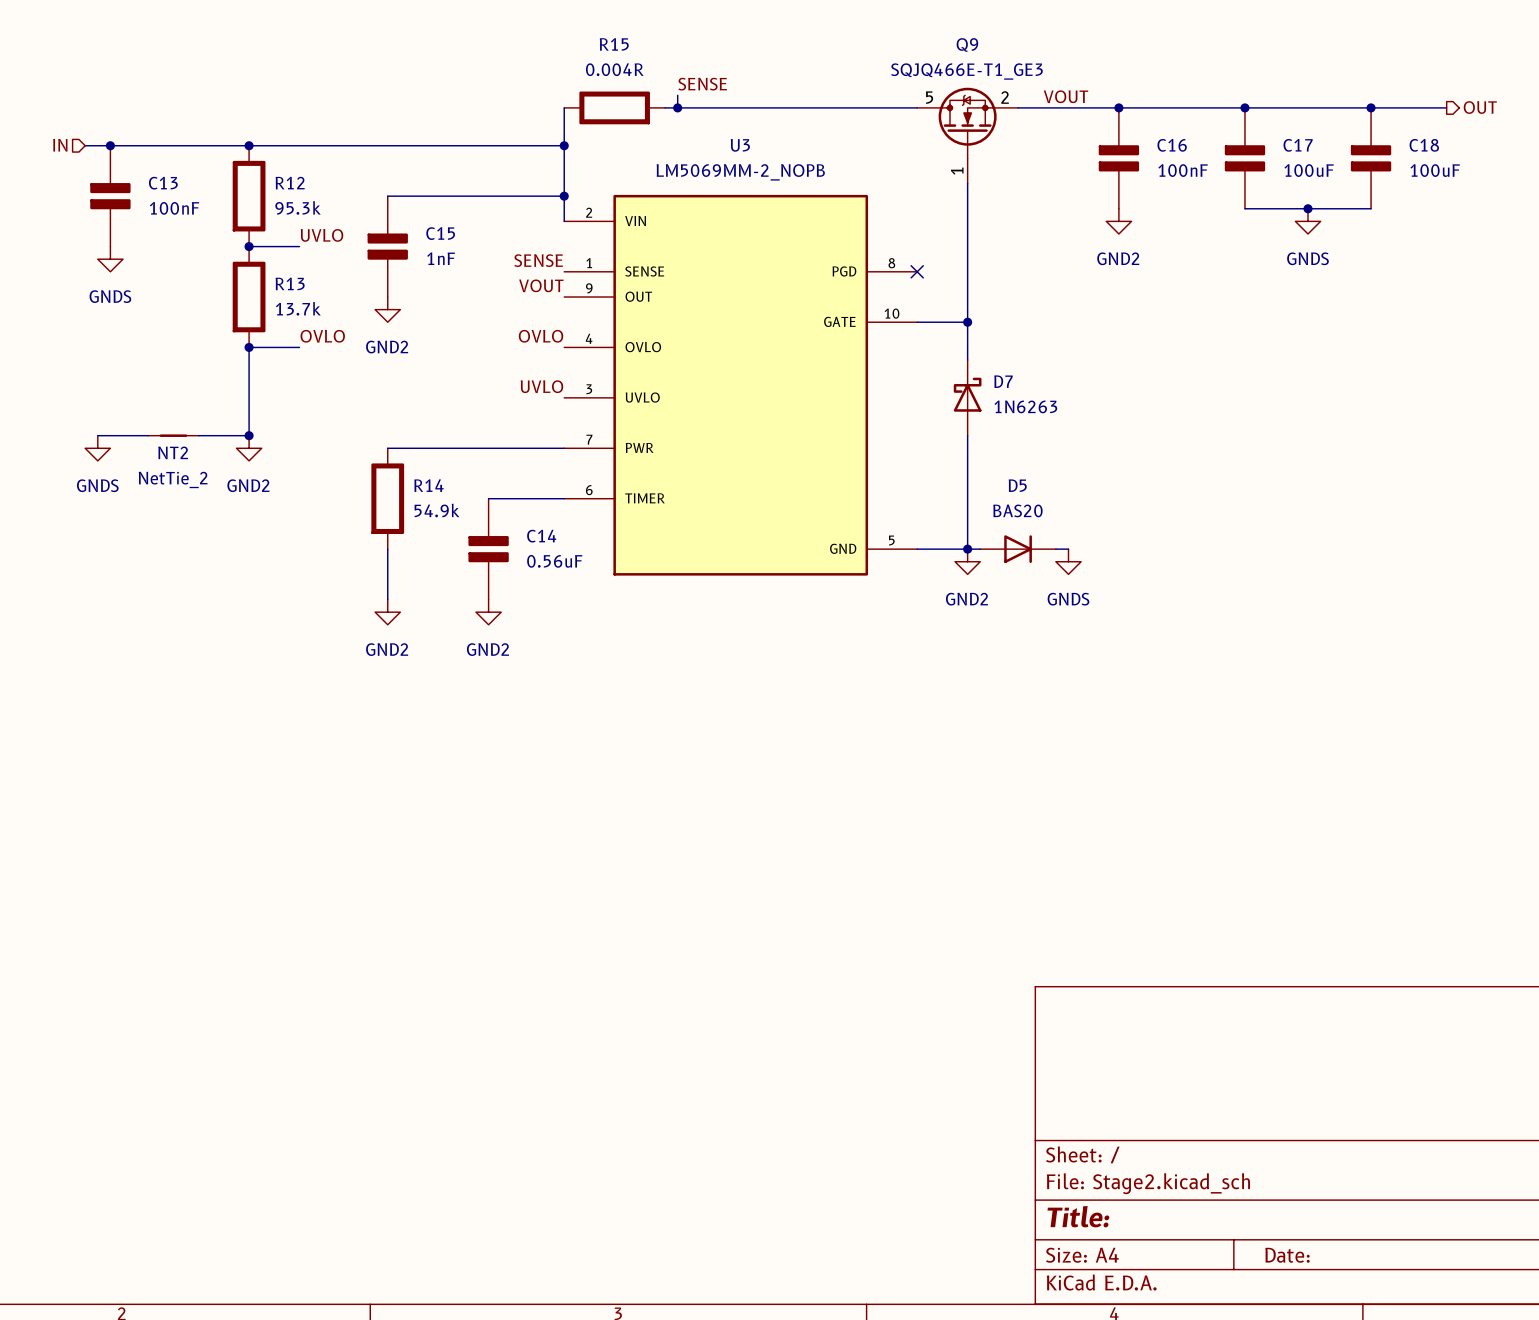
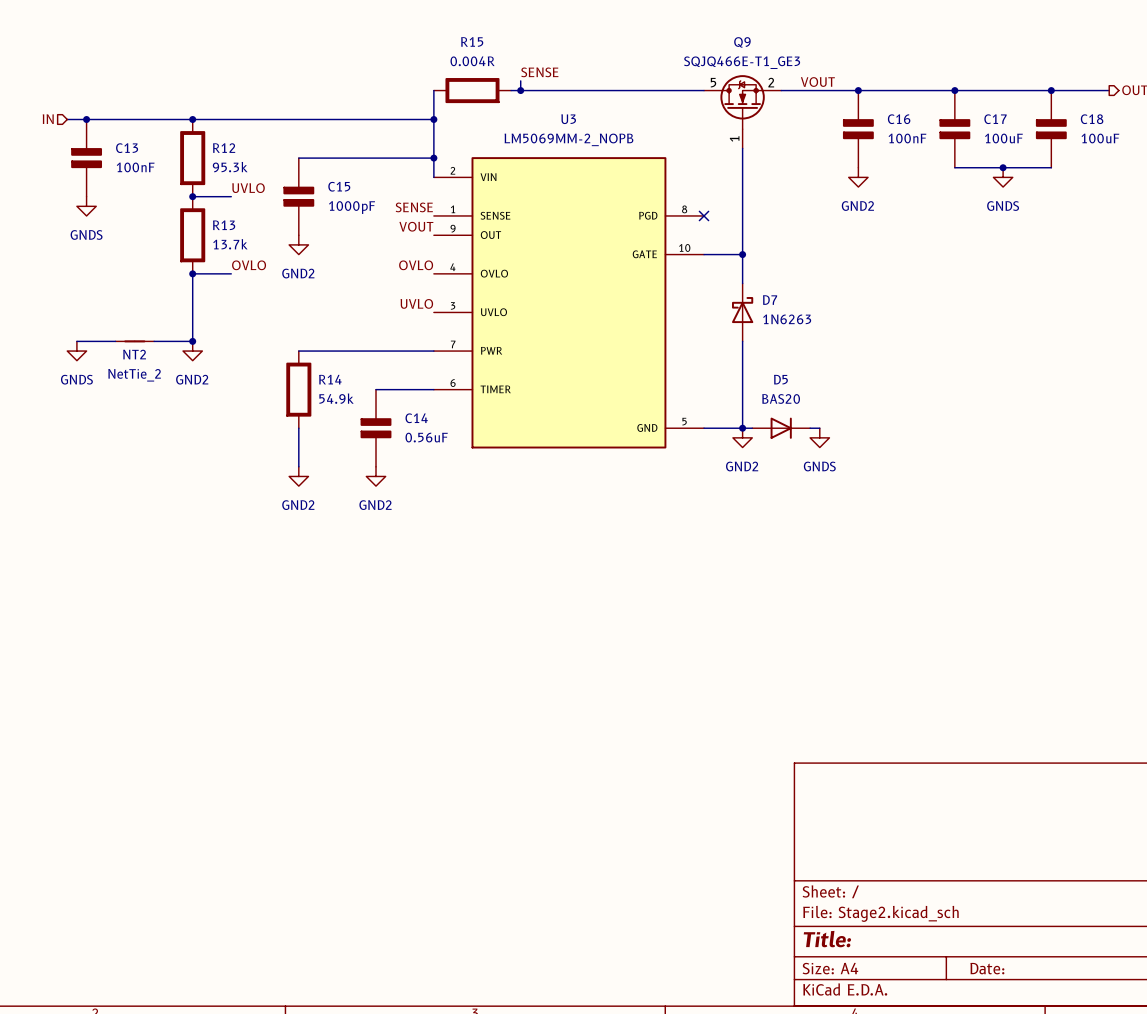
C15 value: 1nF (441, 258) -> 1000pF (352, 207)

